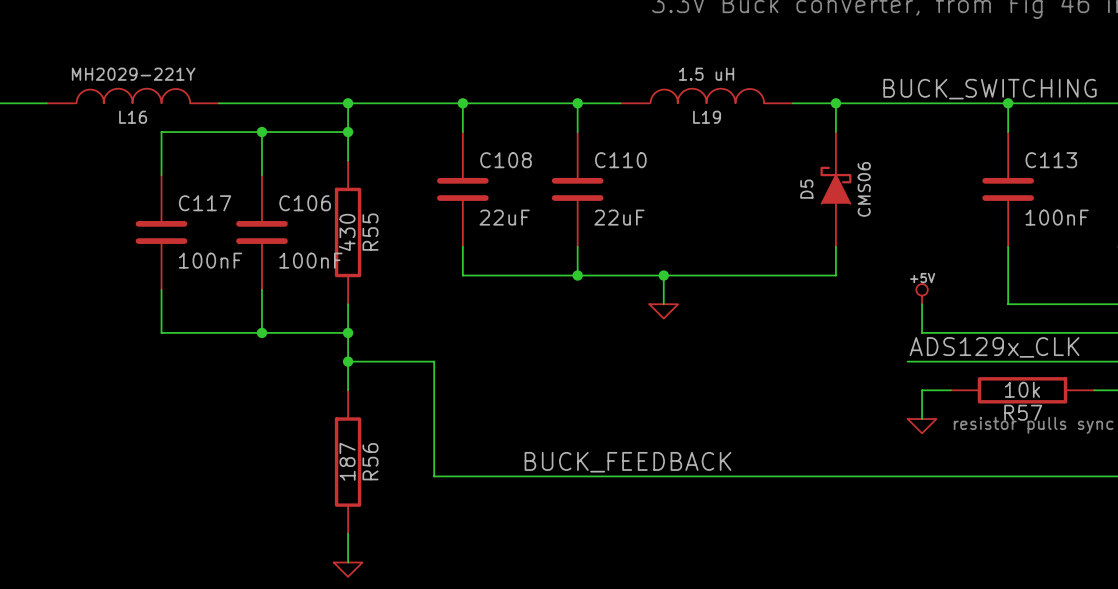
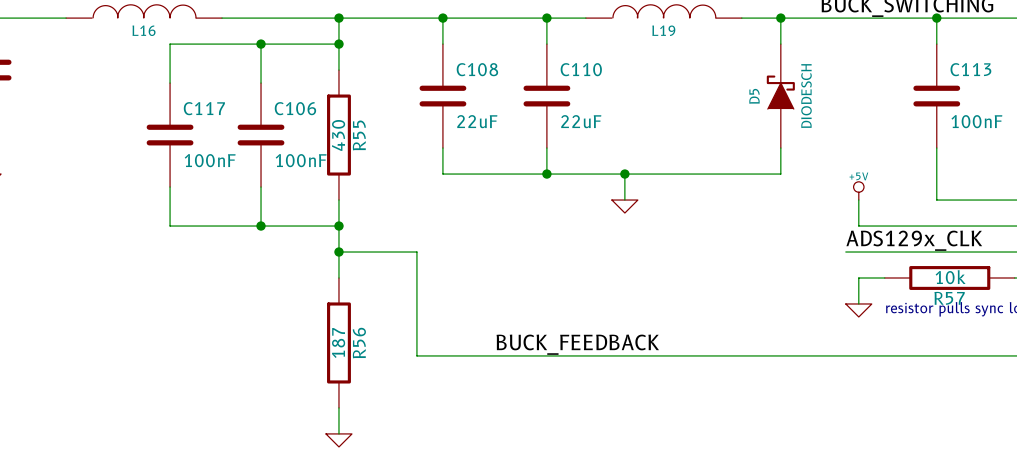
D5 value: CMS06 (864, 189) -> DIODESCH (806, 96)

